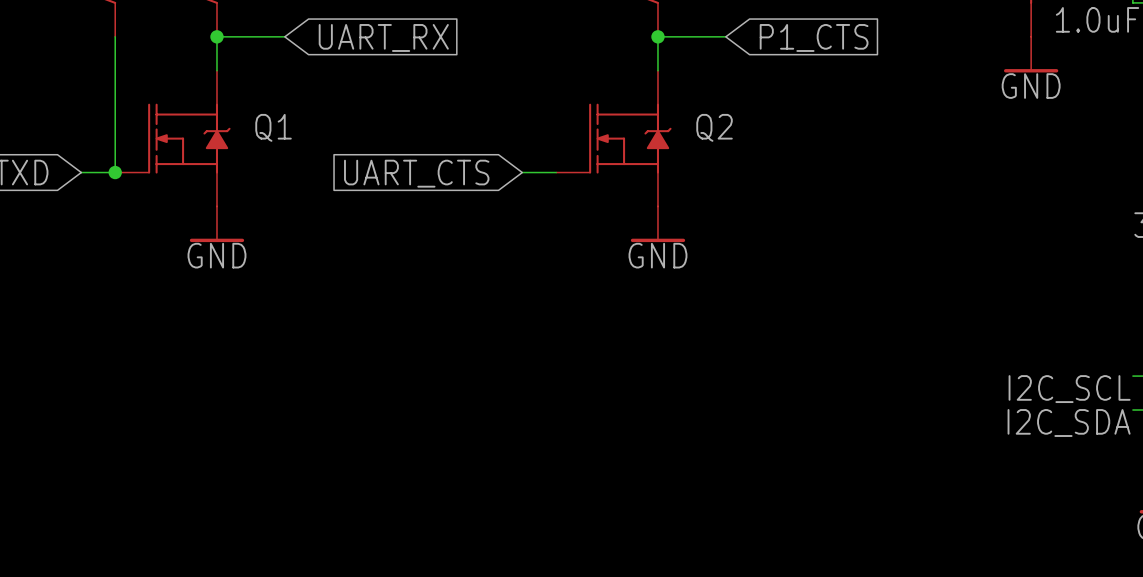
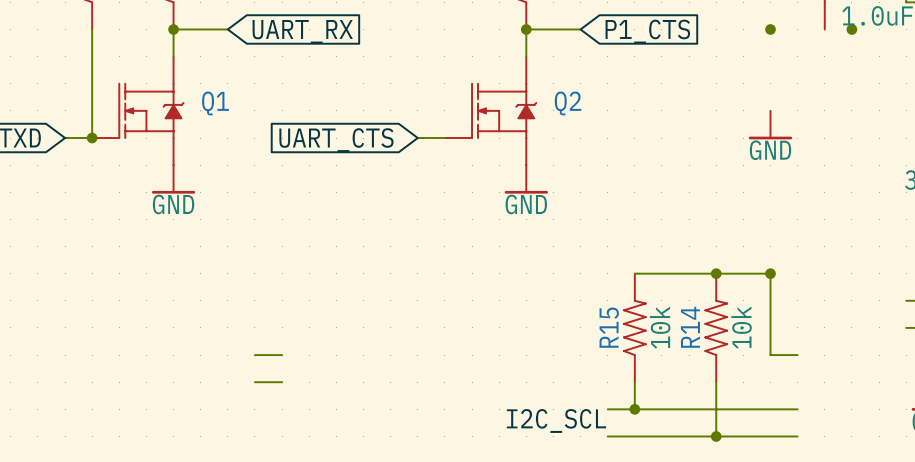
junction: none -> (770, 29)
junction: none -> (851, 29)
power symbol position: GND (1031, 54) -> GND (770, 125)
wire: none -> (634, 273) (770, 273) (770, 355) (797, 355)
junction: none -> (716, 273)
junction: none -> (770, 273)
label: I2C_SCL (1069, 389) -> none
R15: none -> 10k (634, 327)
R14: none -> 10k (716, 327)
label: I2C_SDA (1069, 423) -> none
wire: none -> (254, 355) (282, 355)
wire: none -> (254, 382) (282, 382)
wire: none -> (634, 382) (634, 409)
wire: none -> (716, 382) (716, 436)
wire: none -> (607, 409) (797, 409)
junction: none -> (634, 409)
label: none -> I2C_SCL (556, 420)
wire: none -> (607, 436) (797, 436)
junction: none -> (716, 436)

